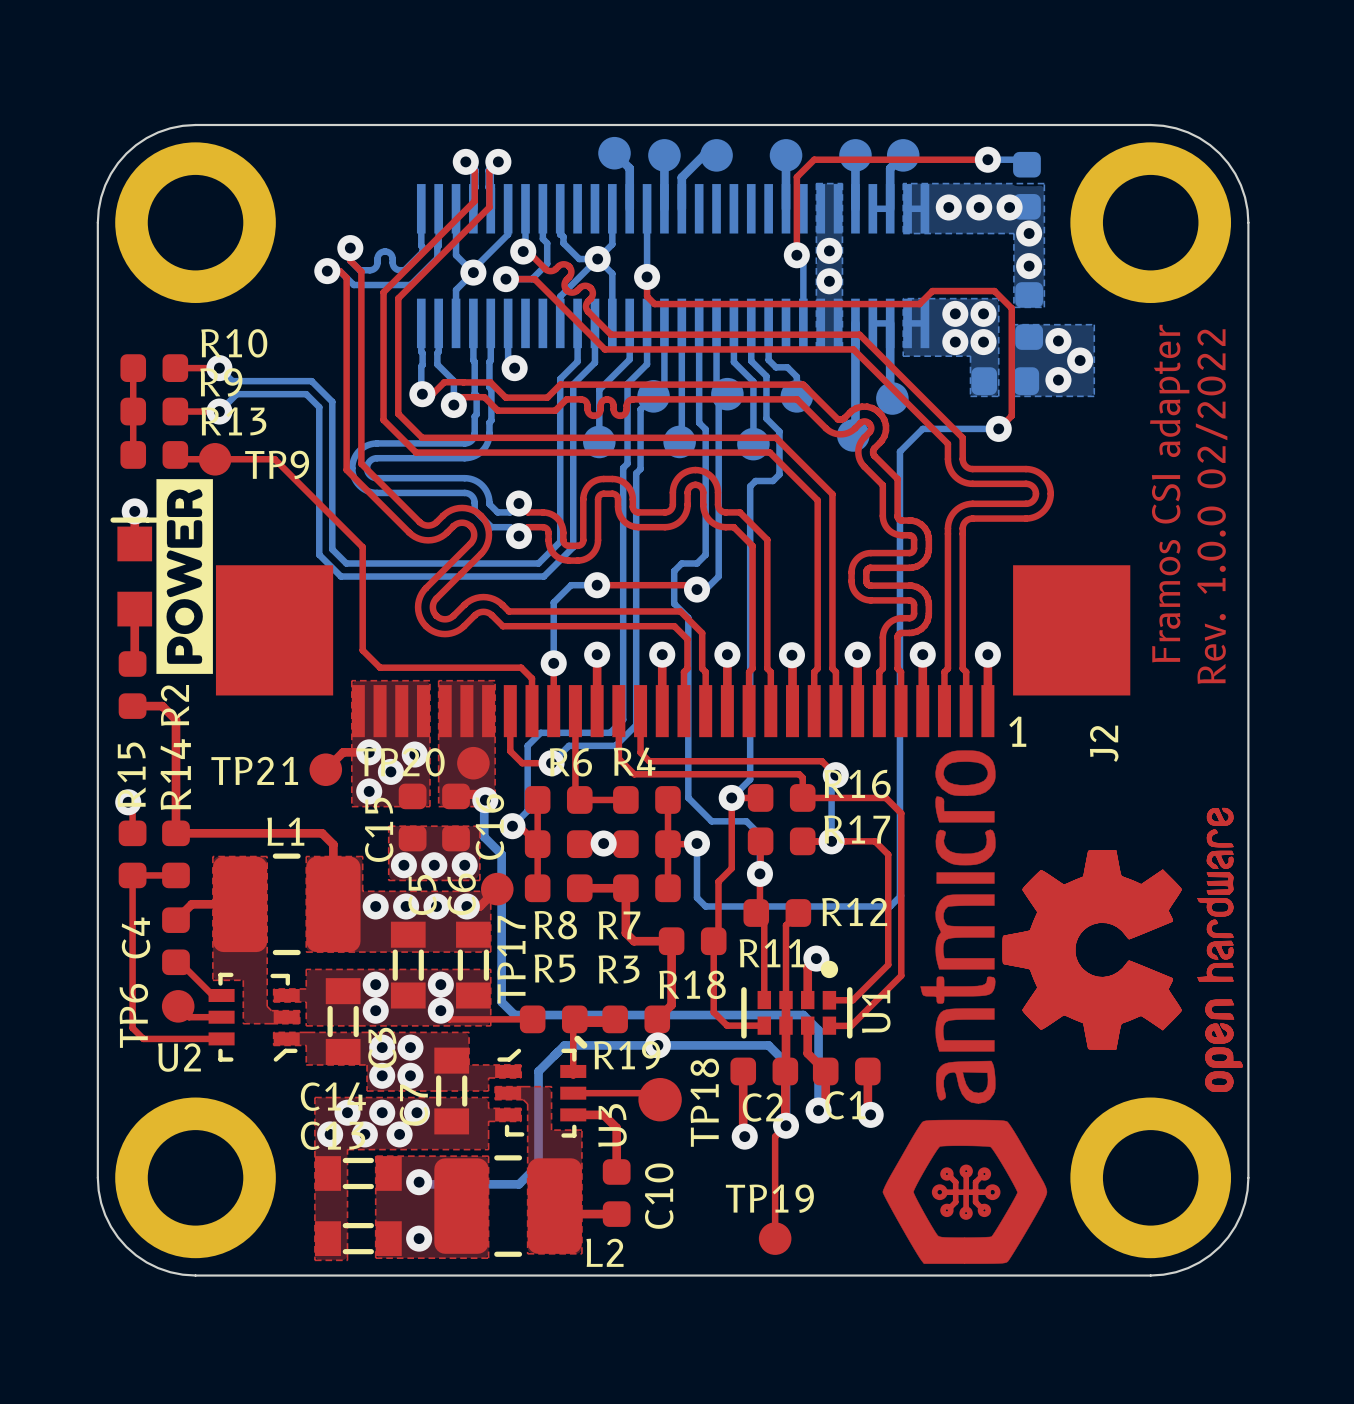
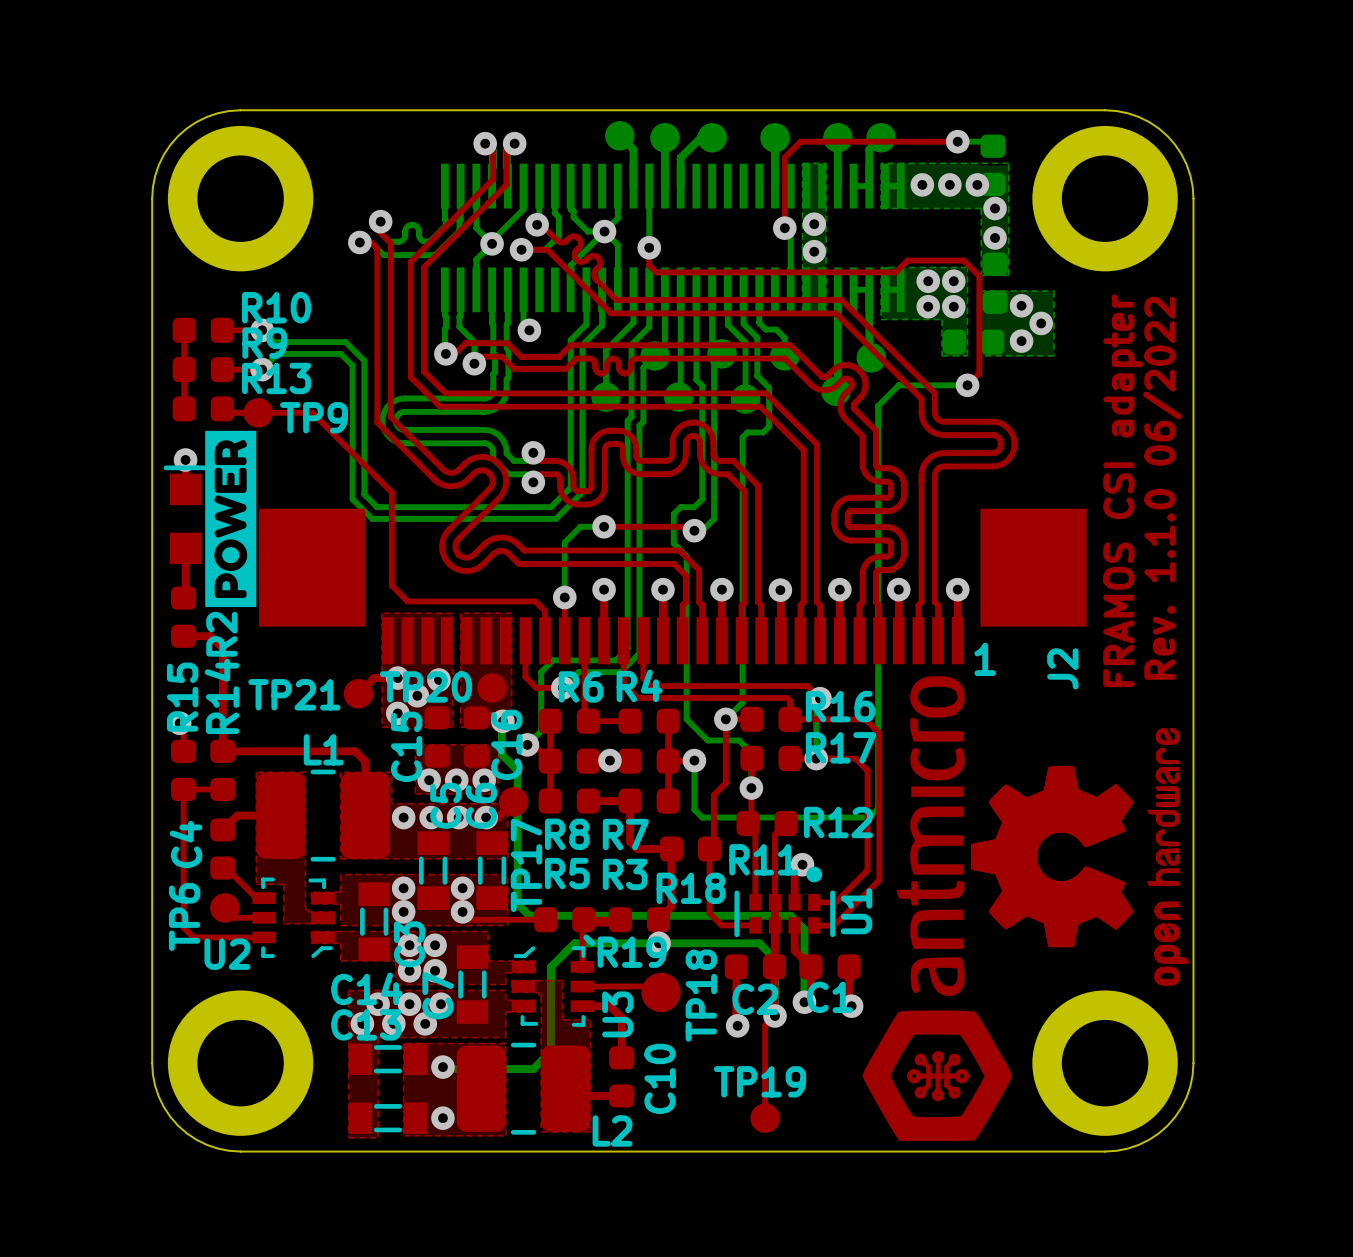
text: Framos CSI adapter (1169, 493) -> FRAMOS CSI adapter (1123, 490)
text: Rev. 1.0.0 02/2022 (1211, 506) -> Rev. 1.1.0 06/2022 (1162, 488)

